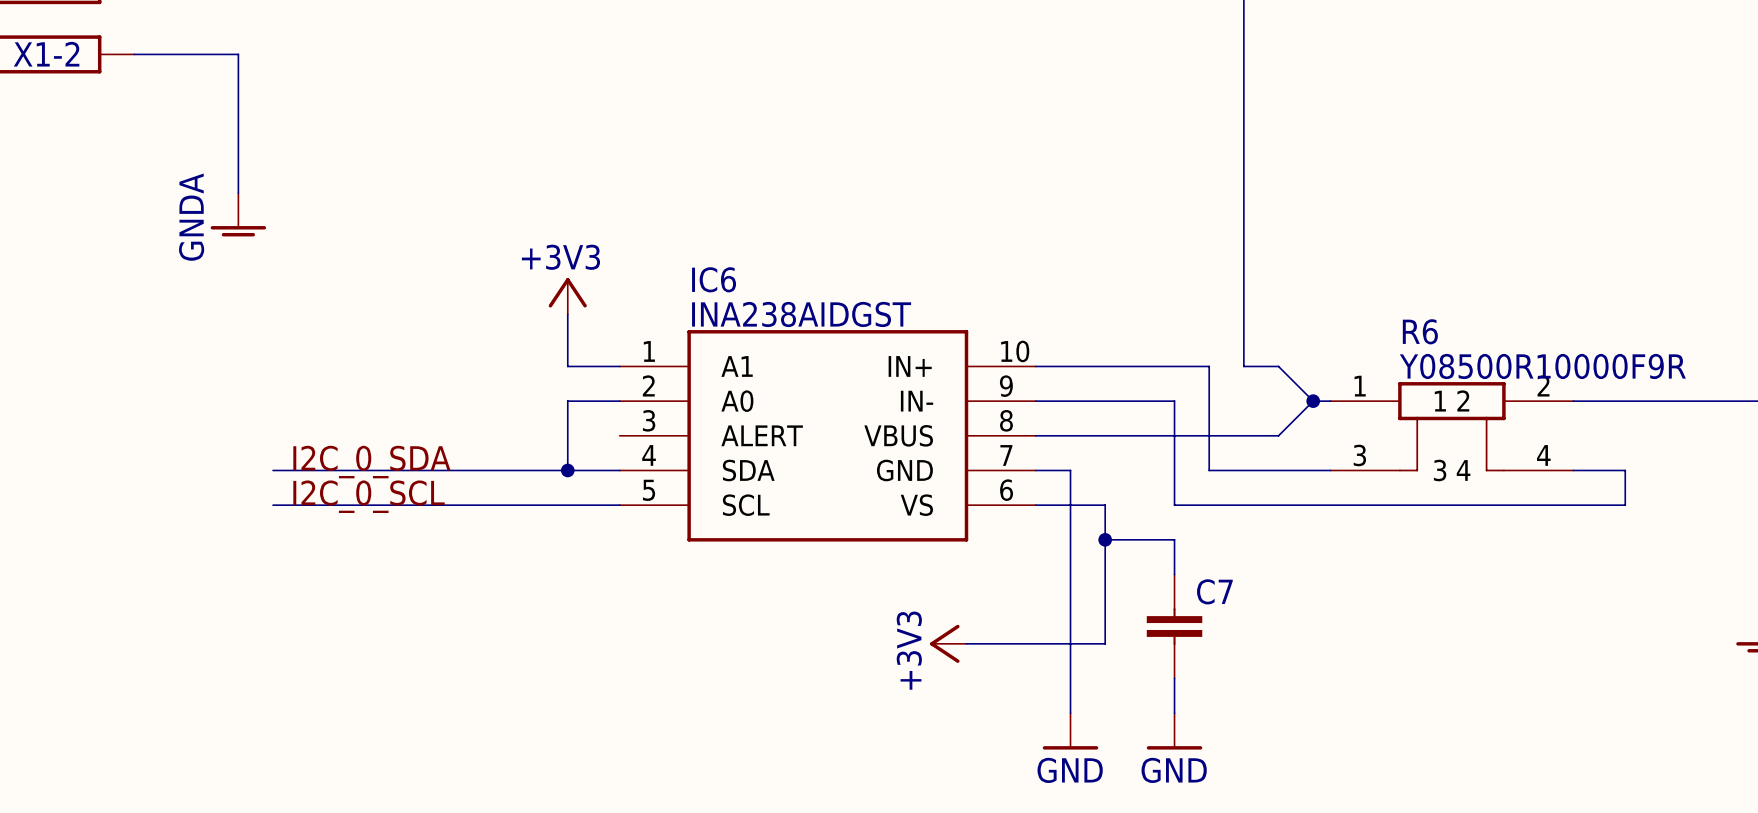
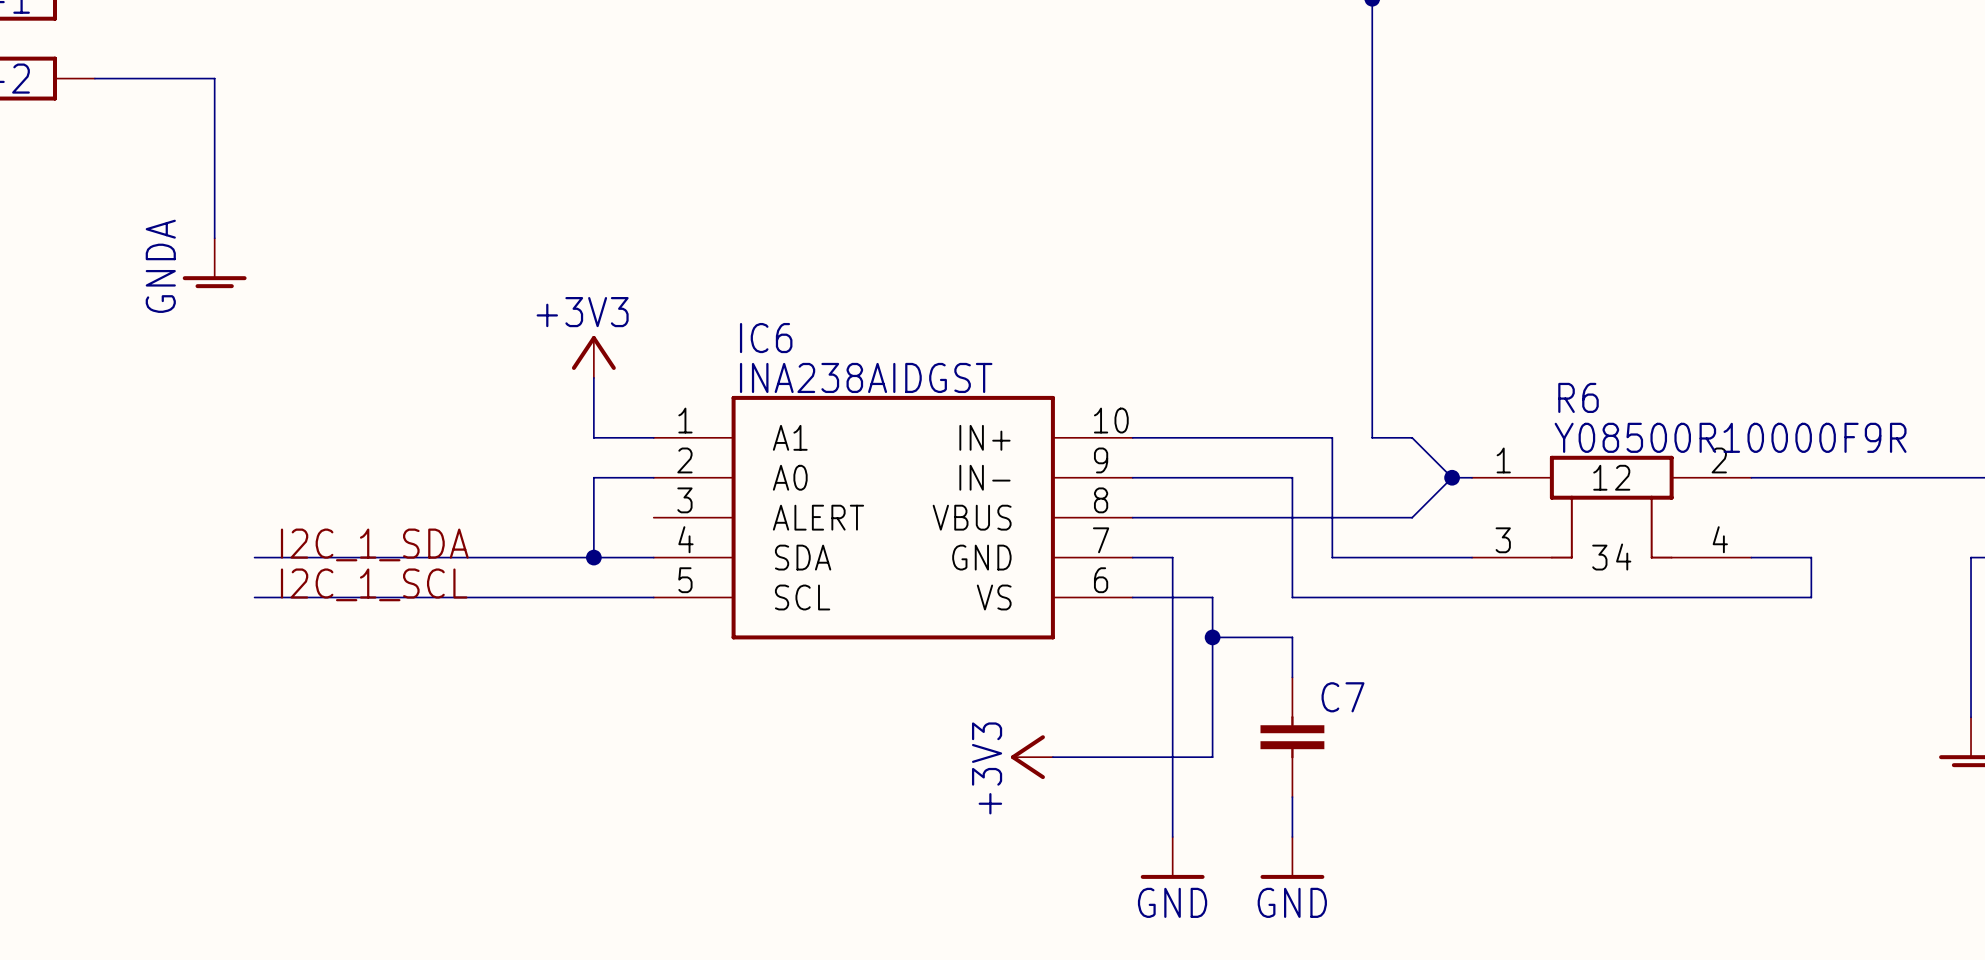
label: I2C_0_SDA (371, 462) -> I2C_1_SDA (374, 544)
label: I2C_0_SCL (369, 496) -> I2C_1_SCL (374, 584)

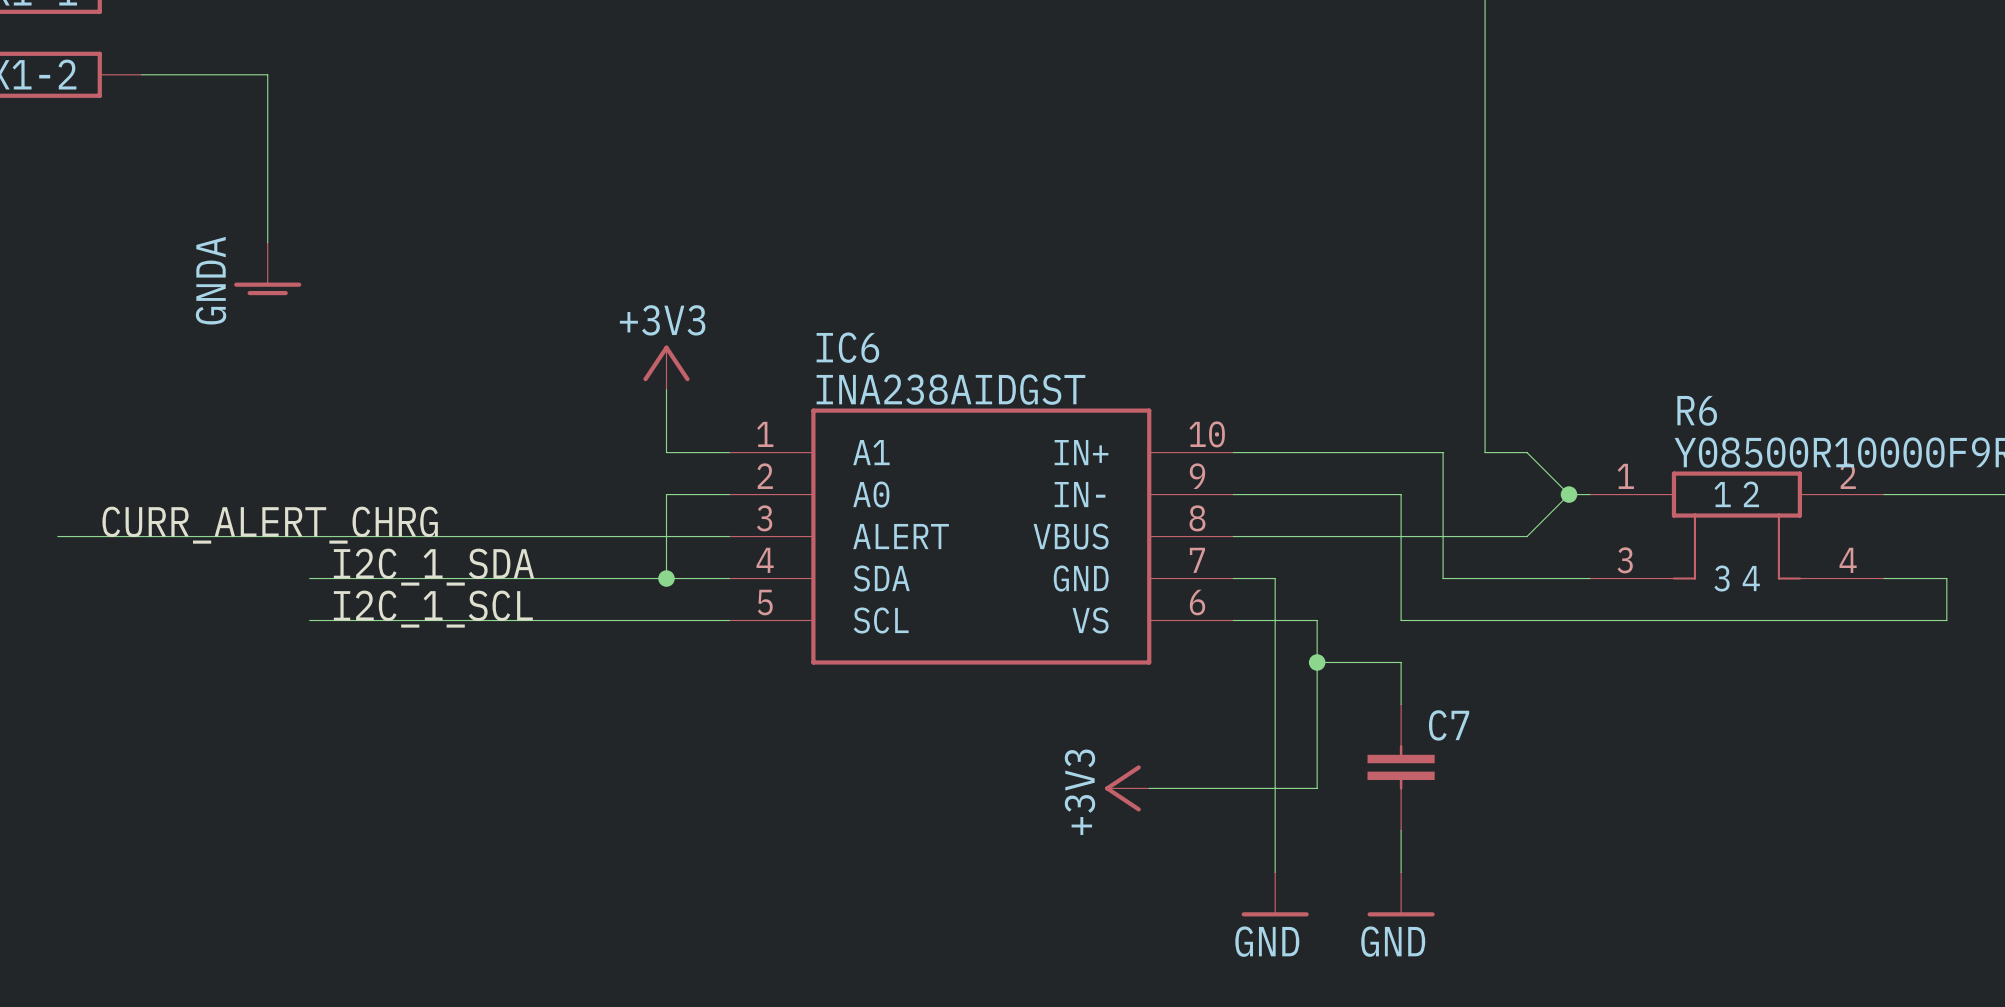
label: none -> CURR_ALERT_CHRG (270, 525)
wire: none -> (57, 536) (729, 536)

